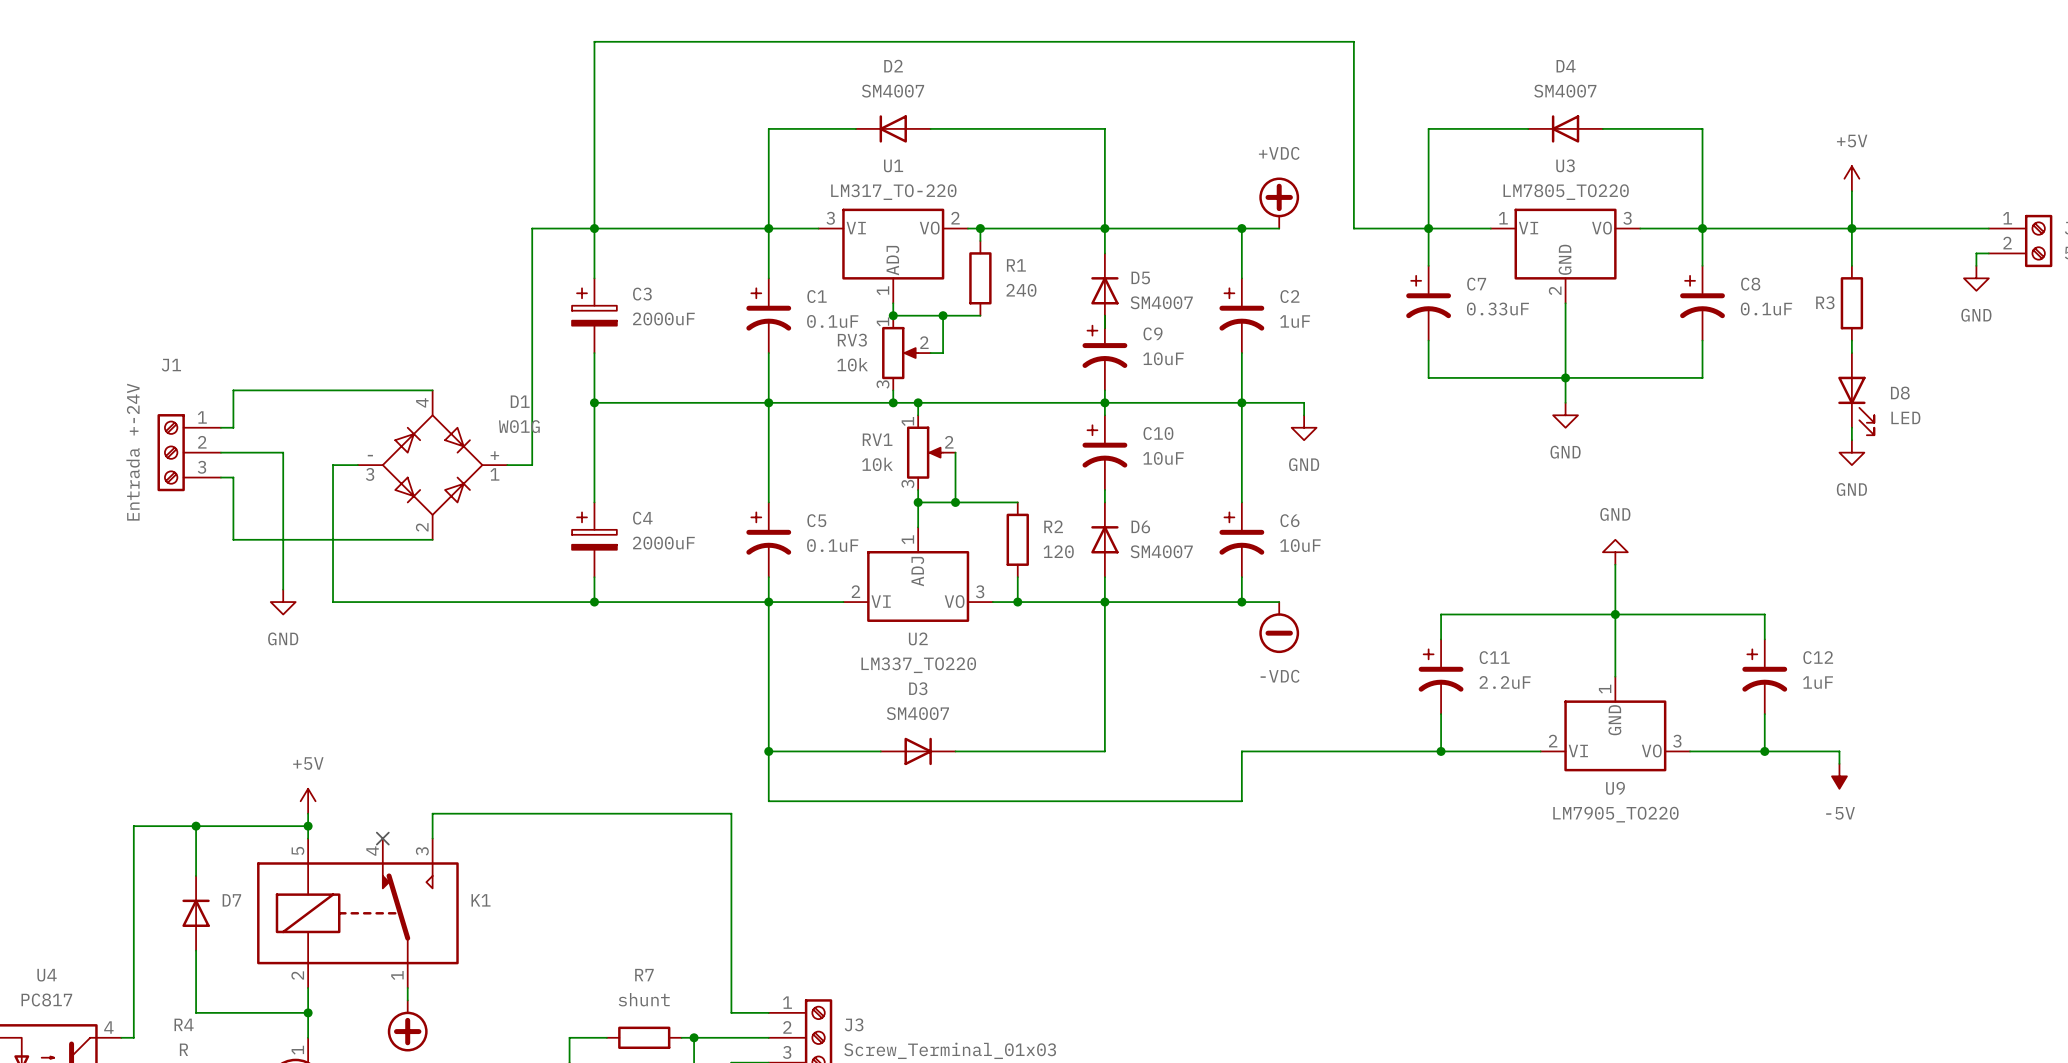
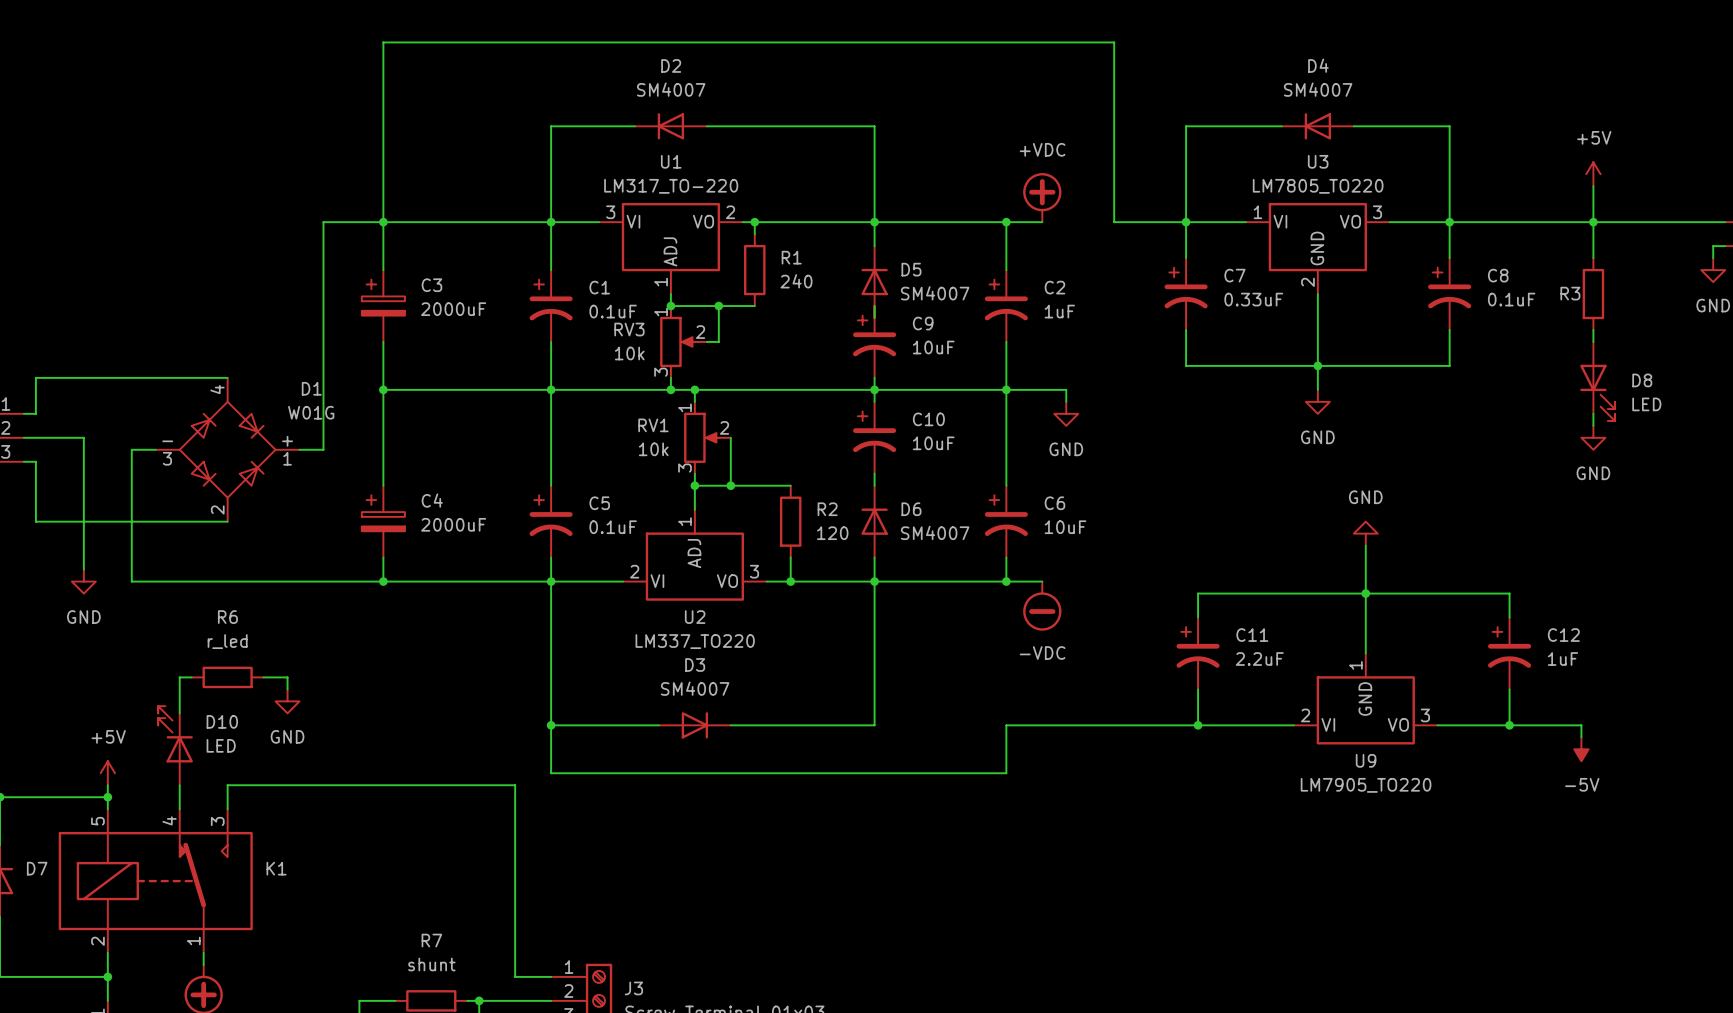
wire: none -> (191, 677) (179, 677) (179, 713)
R6: none -> r_led (227, 677)
wire: none -> (263, 677) (287, 677) (287, 689)
power symbol: none -> GND (287, 701)
D10: none -> LED (175, 745)
wire: none -> (179, 785) (179, 809)
no-connect mark: (382, 838) -> none

